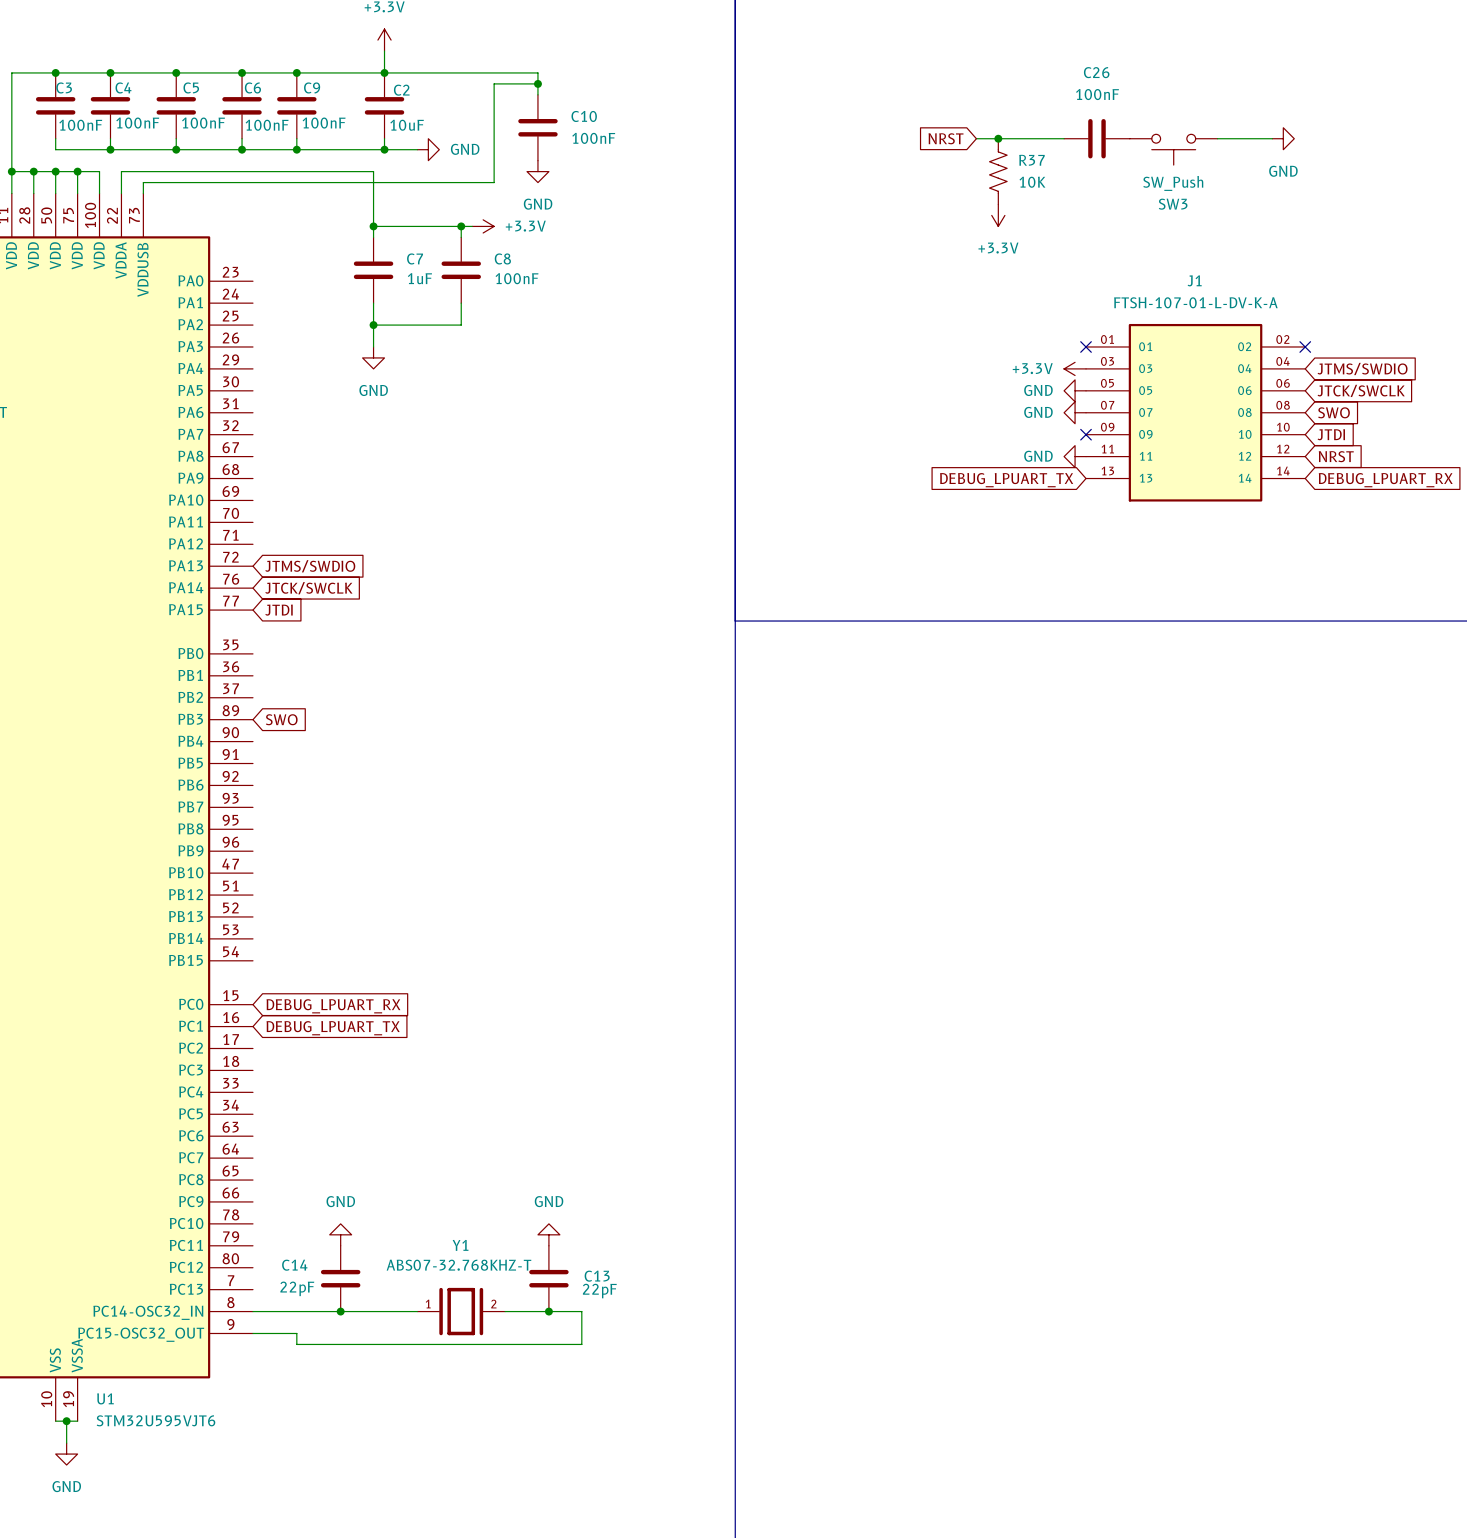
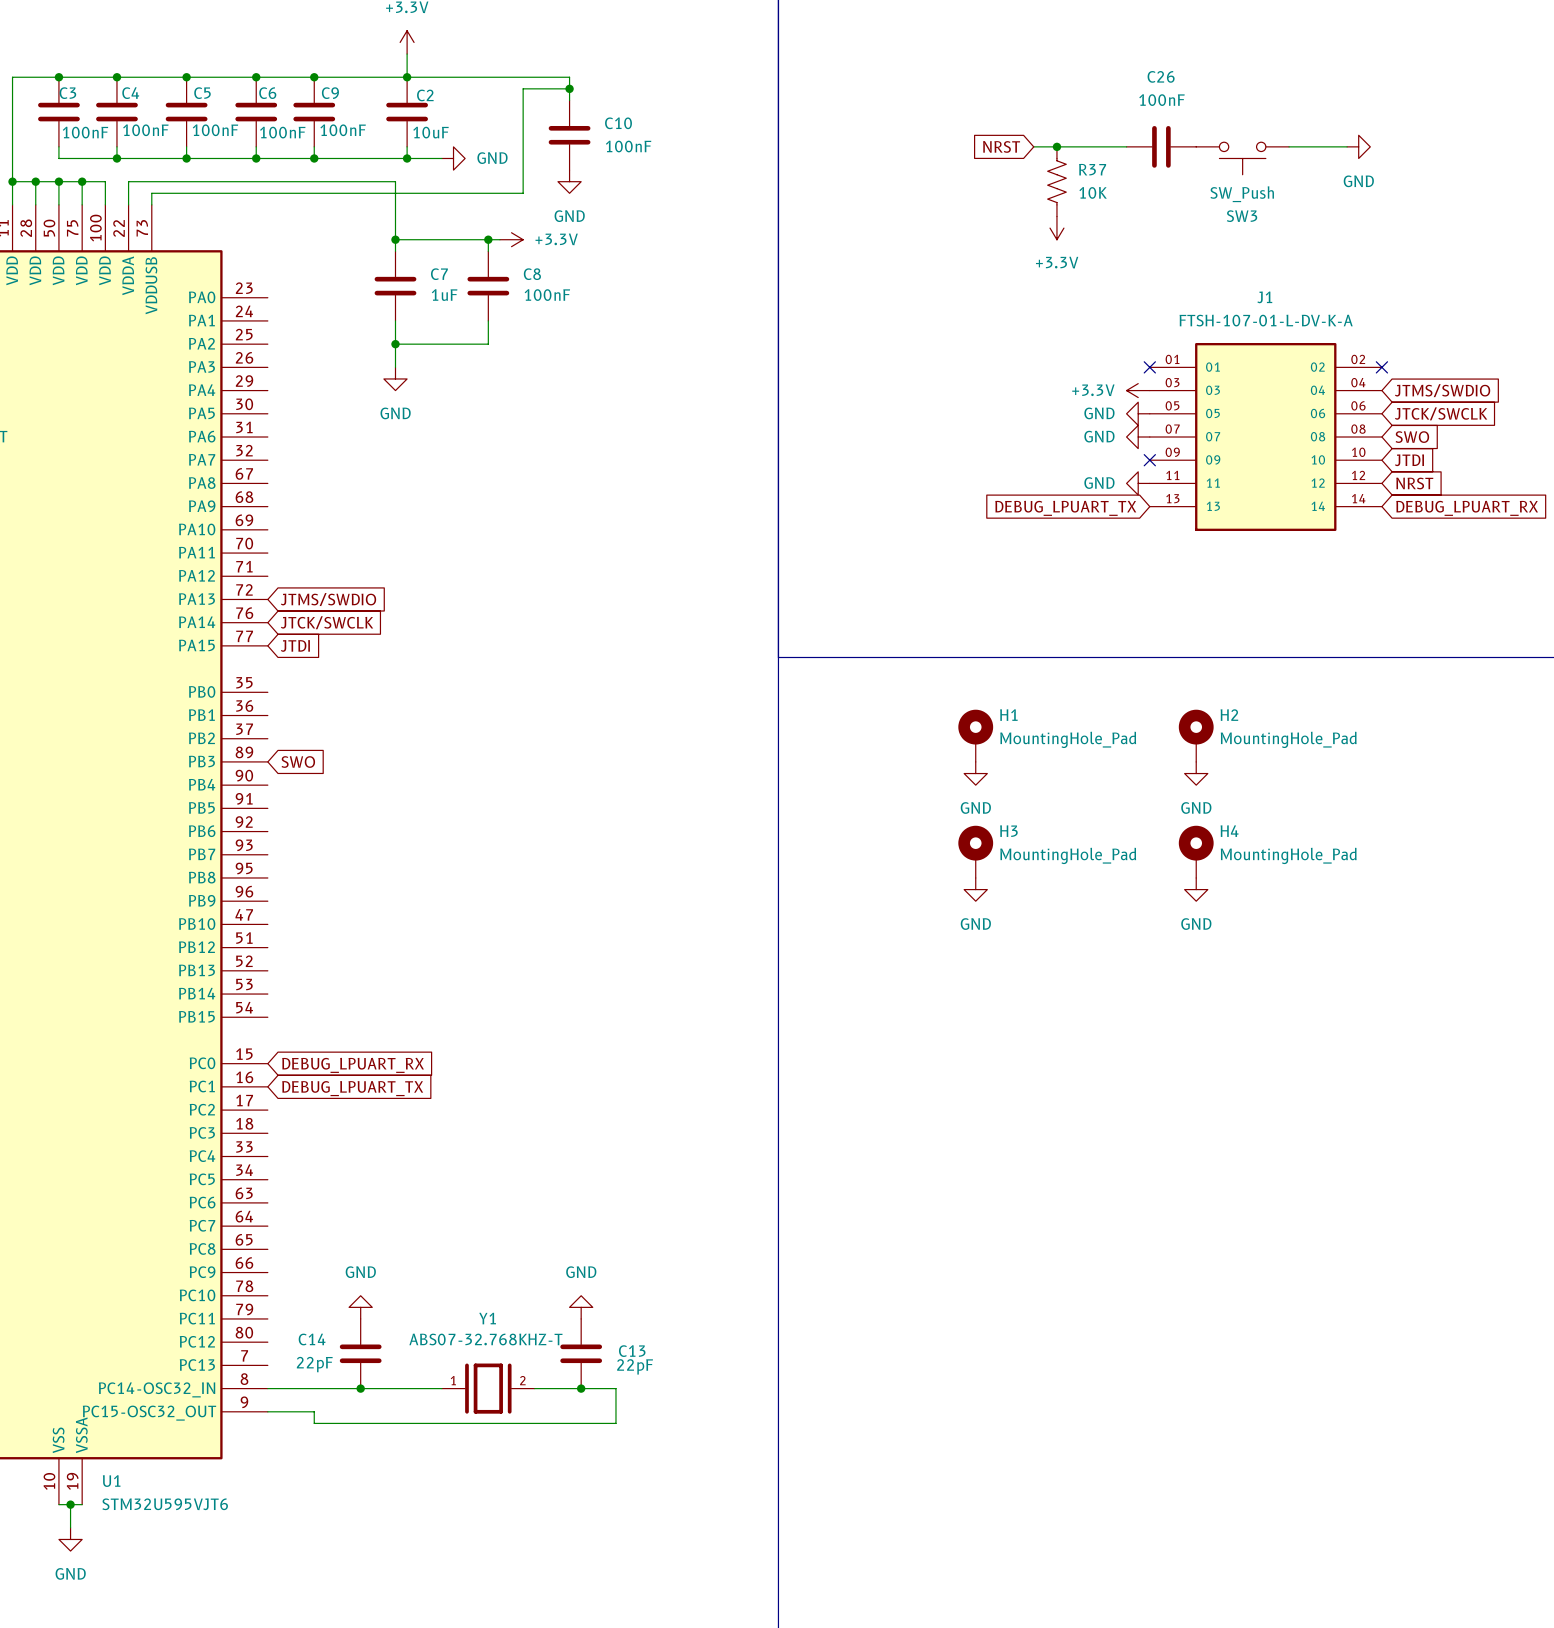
H1: none -> MountingHole_Pad (975, 735)
H2: none -> MountingHole_Pad (1196, 735)
power symbol: none -> GND (975, 773)
power symbol: none -> GND (1196, 773)
H3: none -> MountingHole_Pad (975, 851)
H4: none -> MountingHole_Pad (1196, 851)
power symbol: none -> GND (975, 889)
power symbol: none -> GND (1196, 889)

